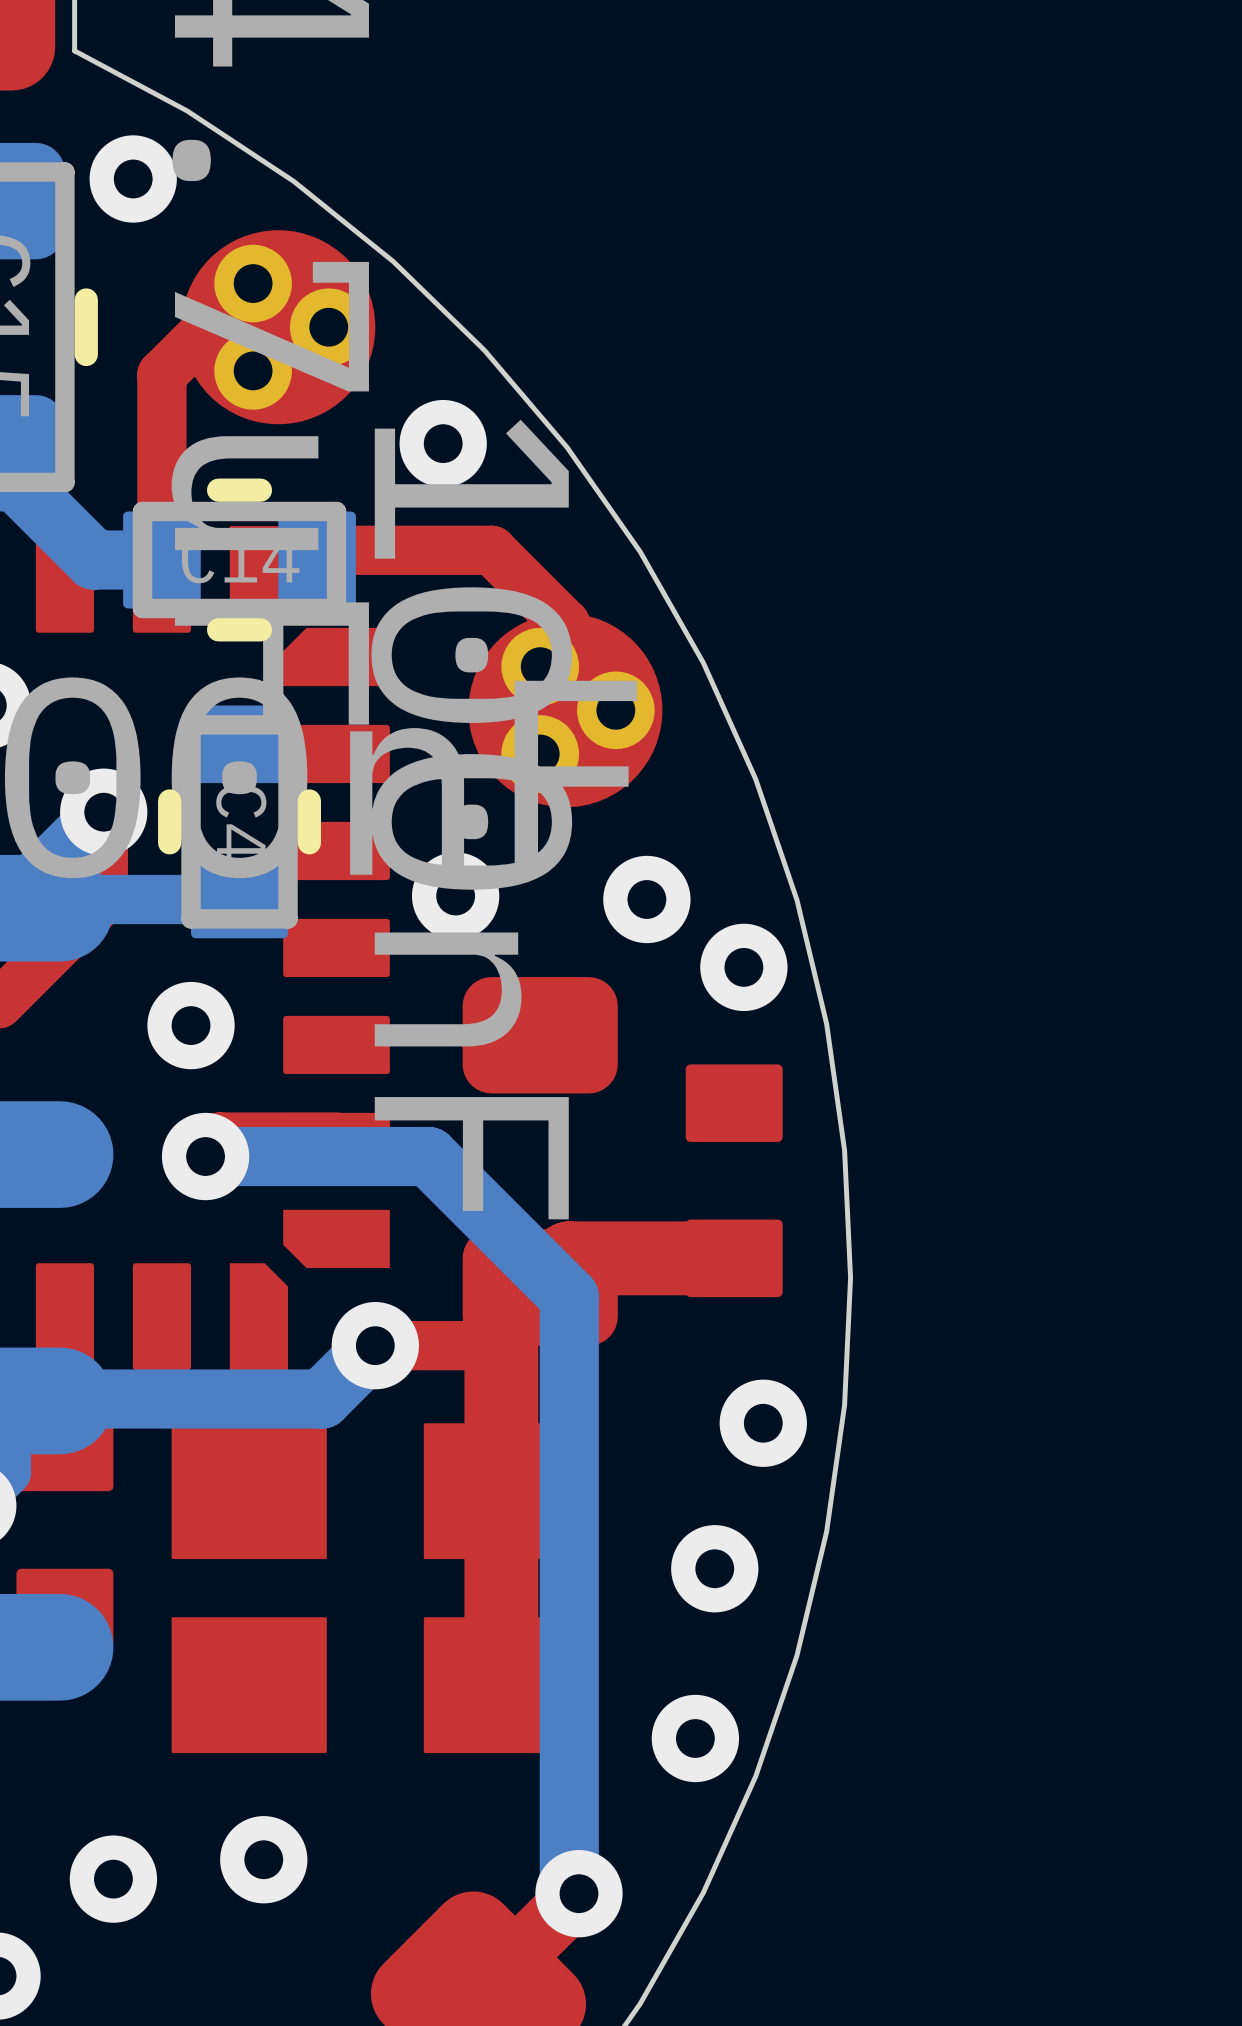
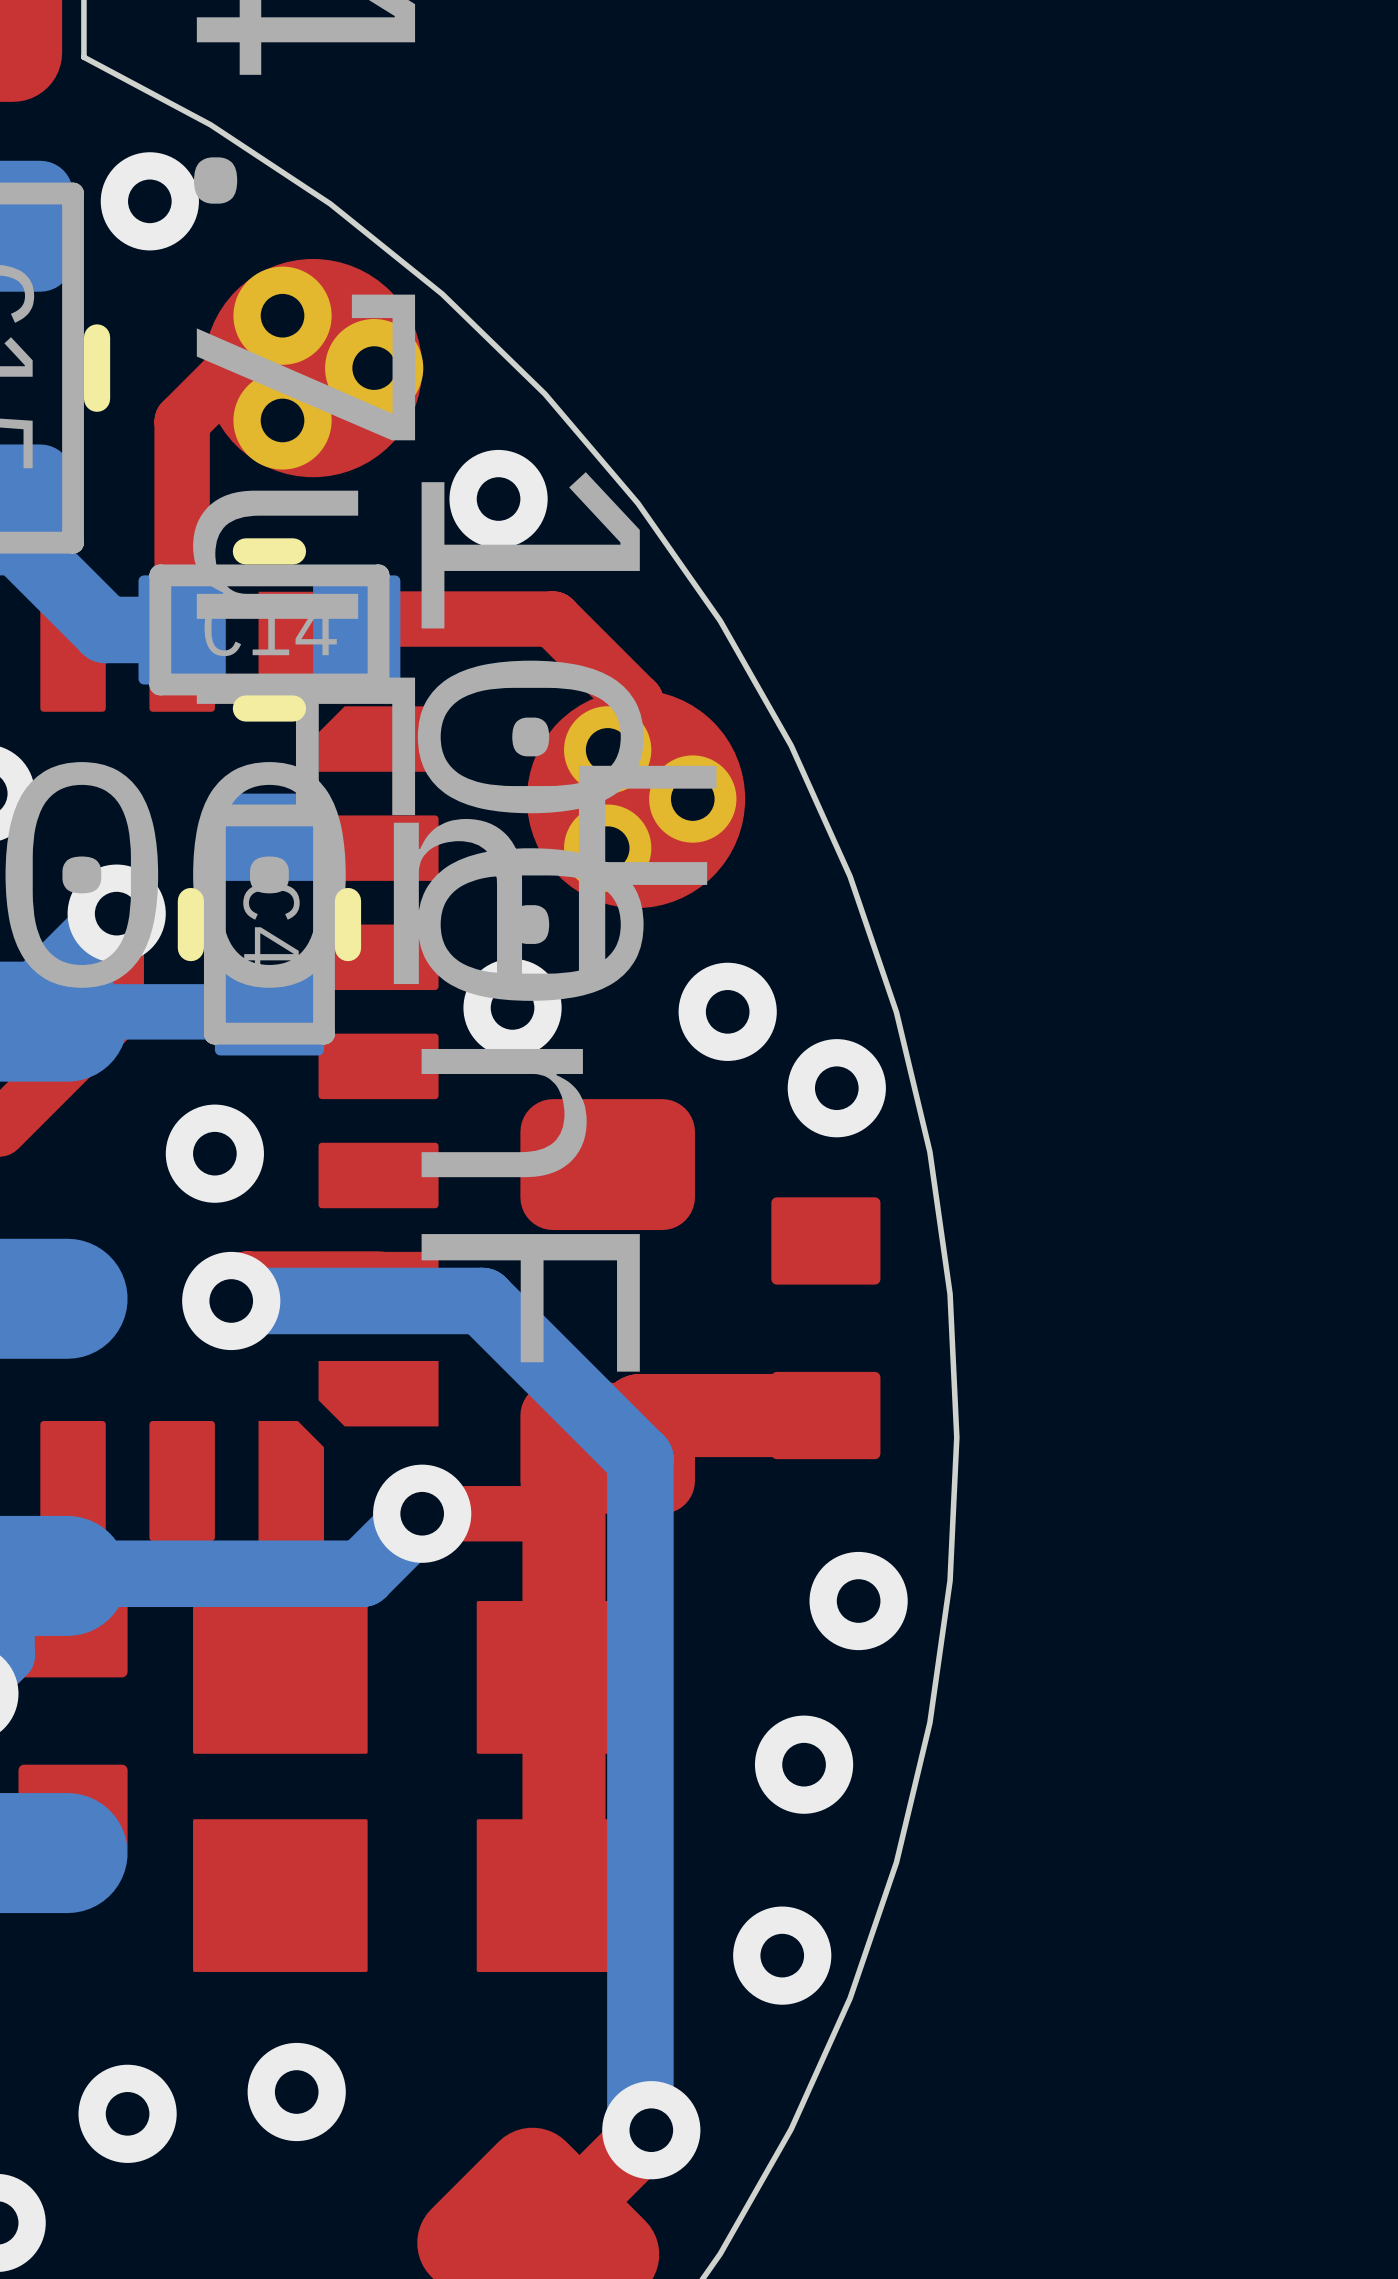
part footprint: [181, 230, 376, 425] -> [203, 258, 424, 478]

